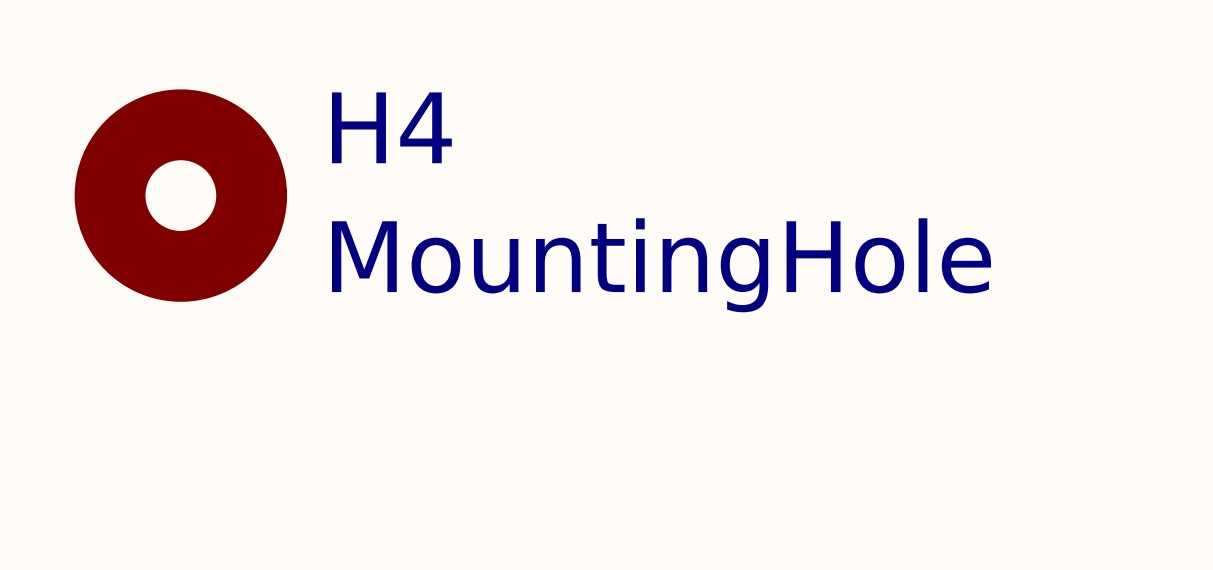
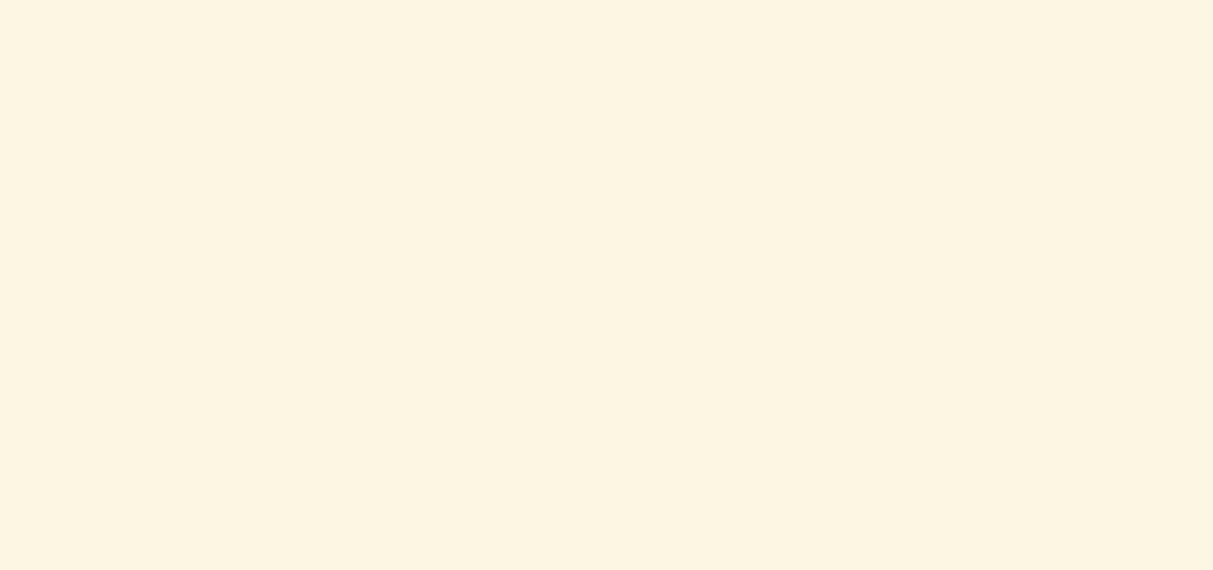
H4: MountingHole (180, 195) -> none

